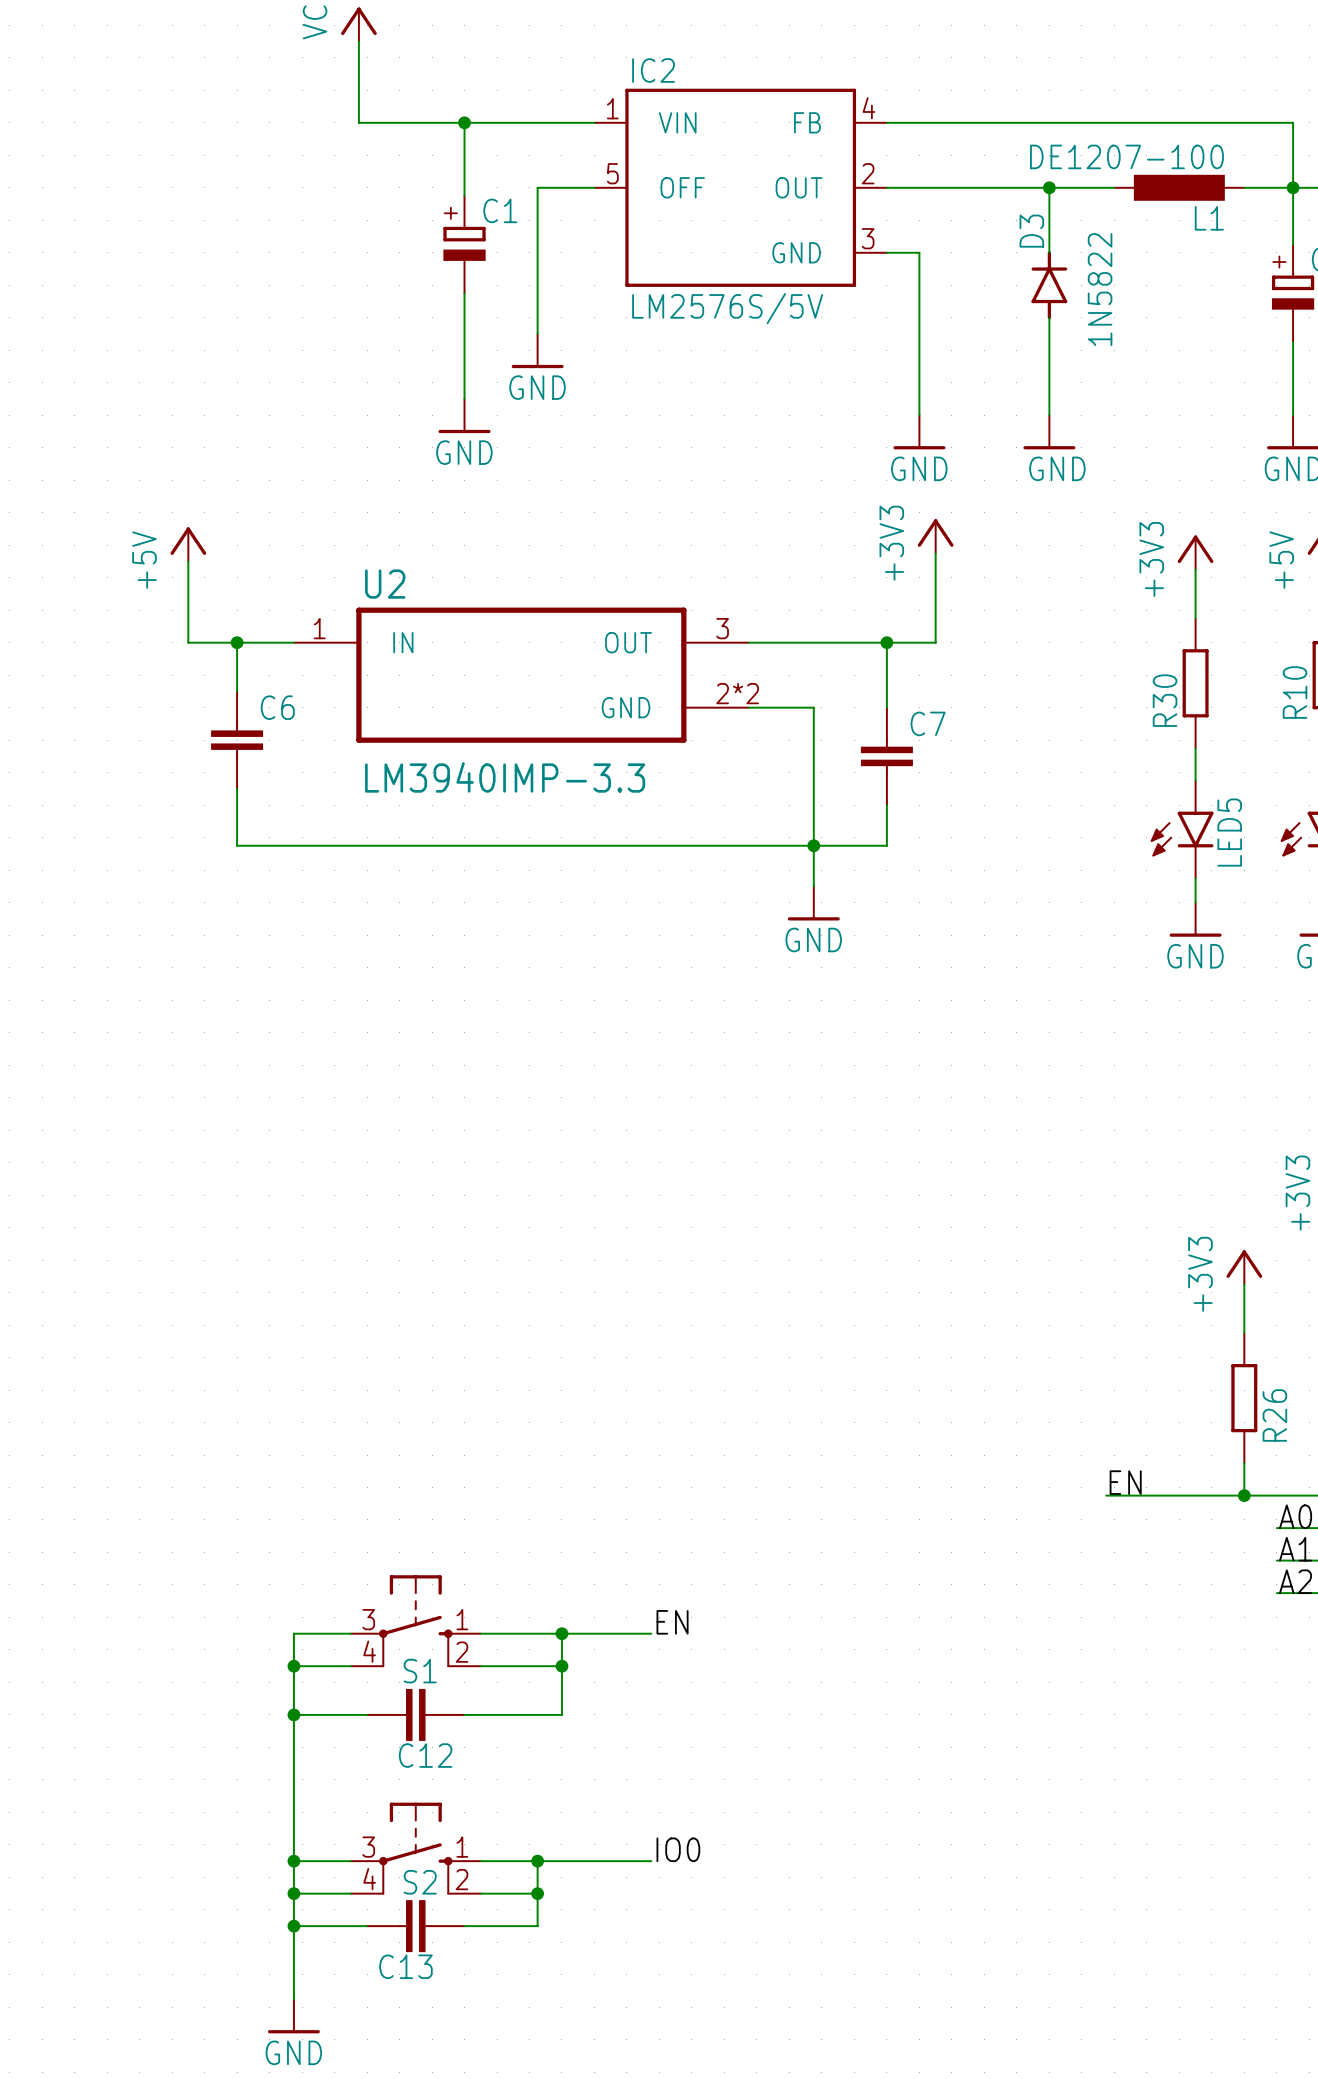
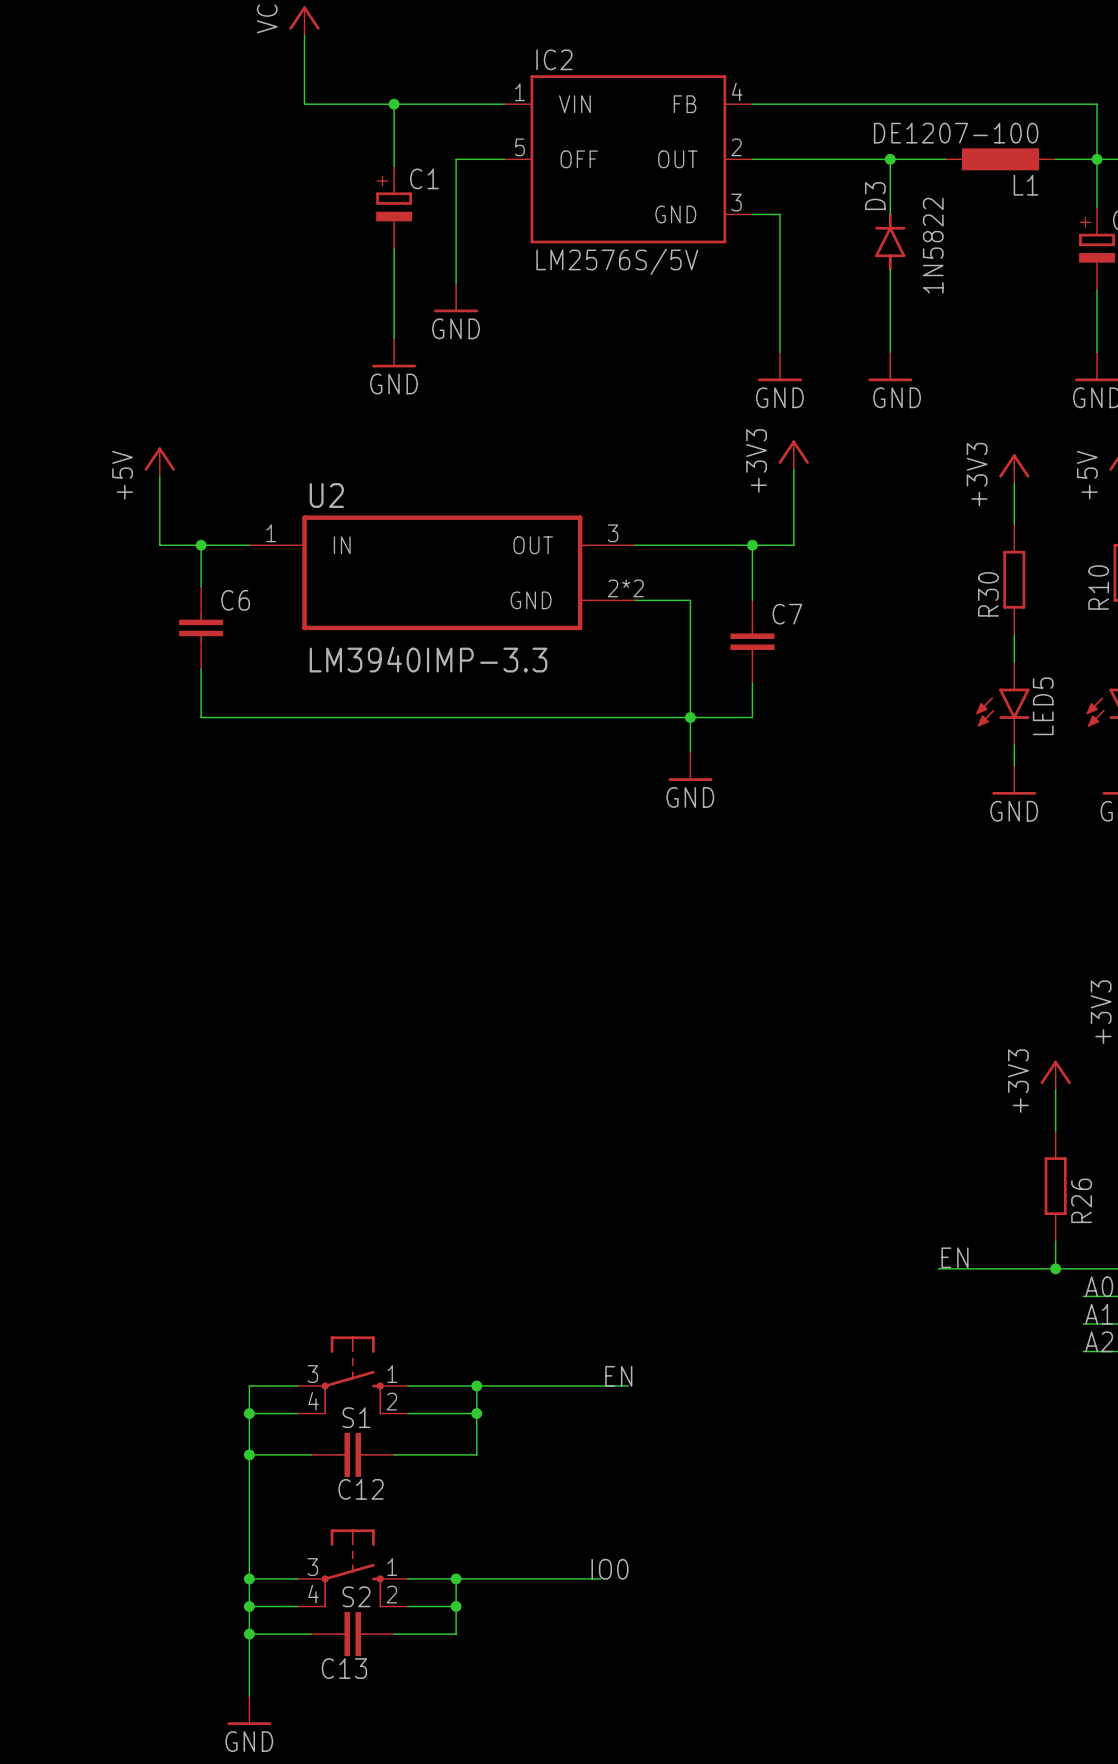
label position: EN (672, 1622) -> EN (618, 1376)
wire: none -> (552, 1385) (628, 1385)
label position: IO0 (678, 1849) -> IO0 (609, 1569)
wire: none -> (552, 1578) (600, 1578)

